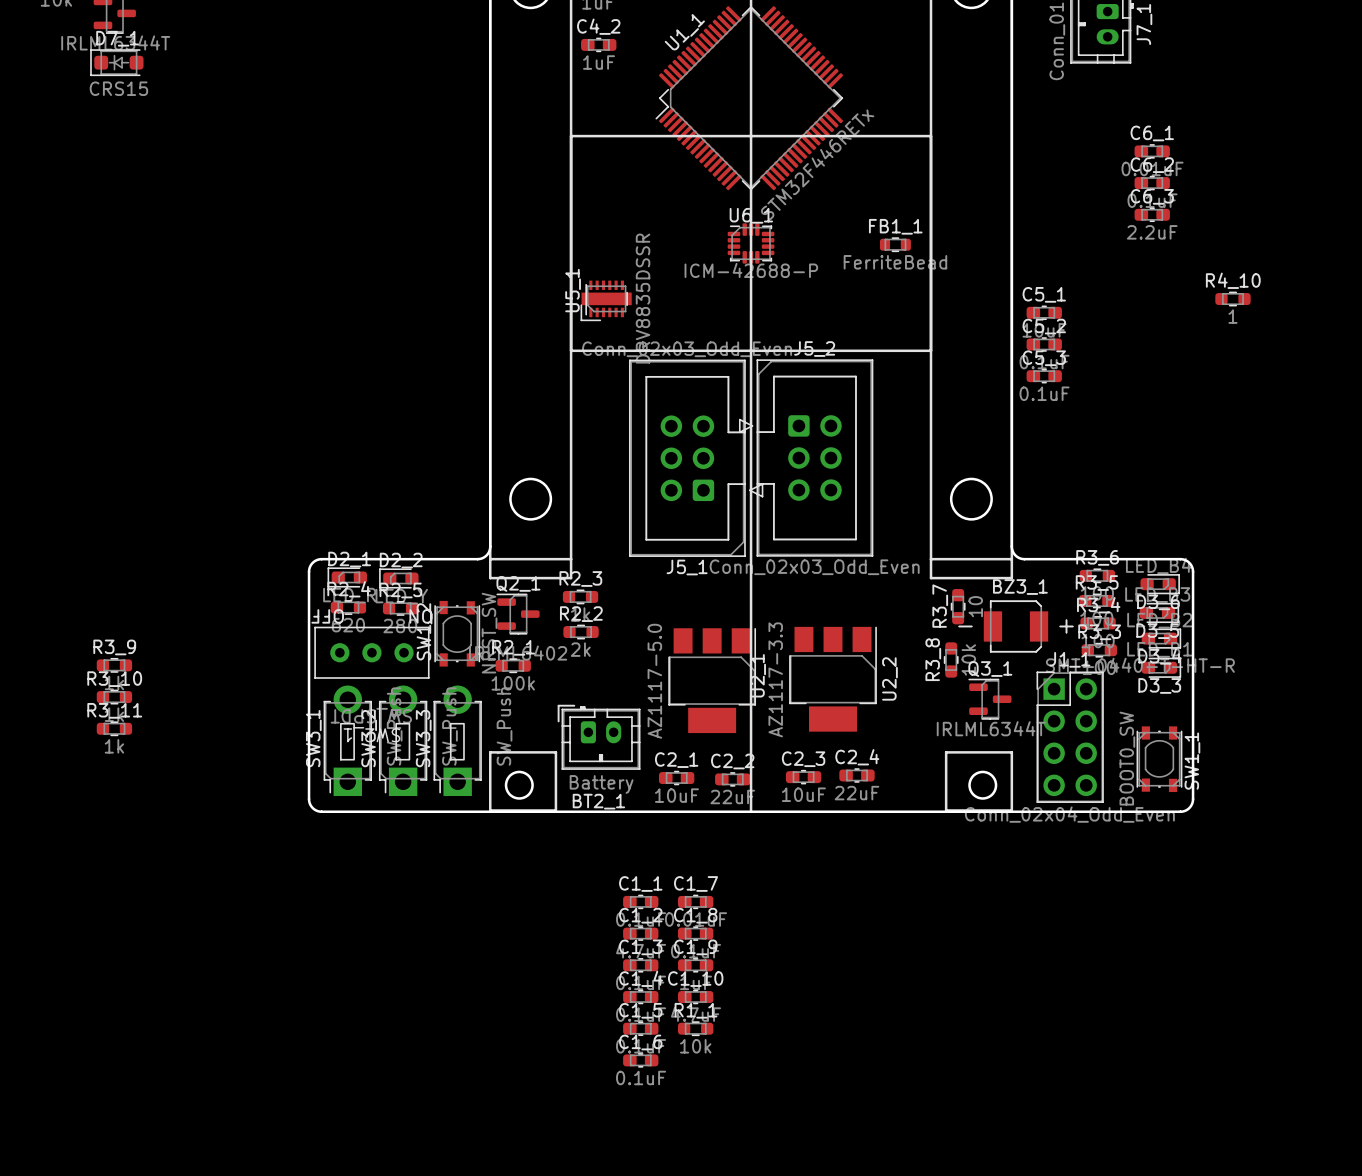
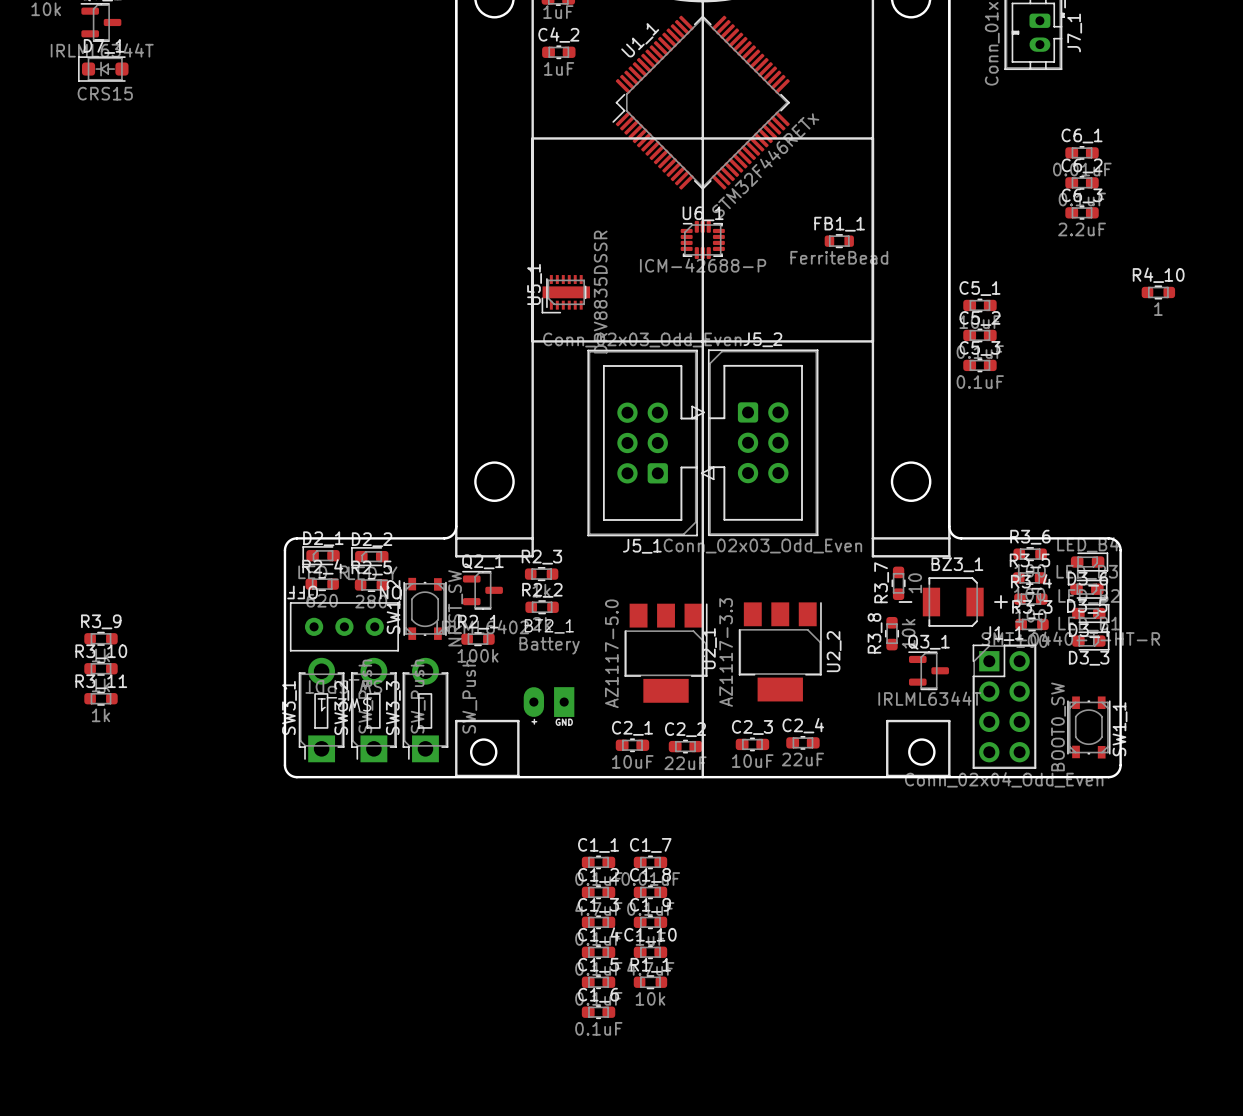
BT2_1 footprint: [557, 704, 641, 770] -> [523, 687, 575, 717]
BT2_1 value position: Battery (601, 784) -> Battery (549, 645)
BT2_1 name position: BT2_1 (598, 801) -> BT2_1 (549, 626)

